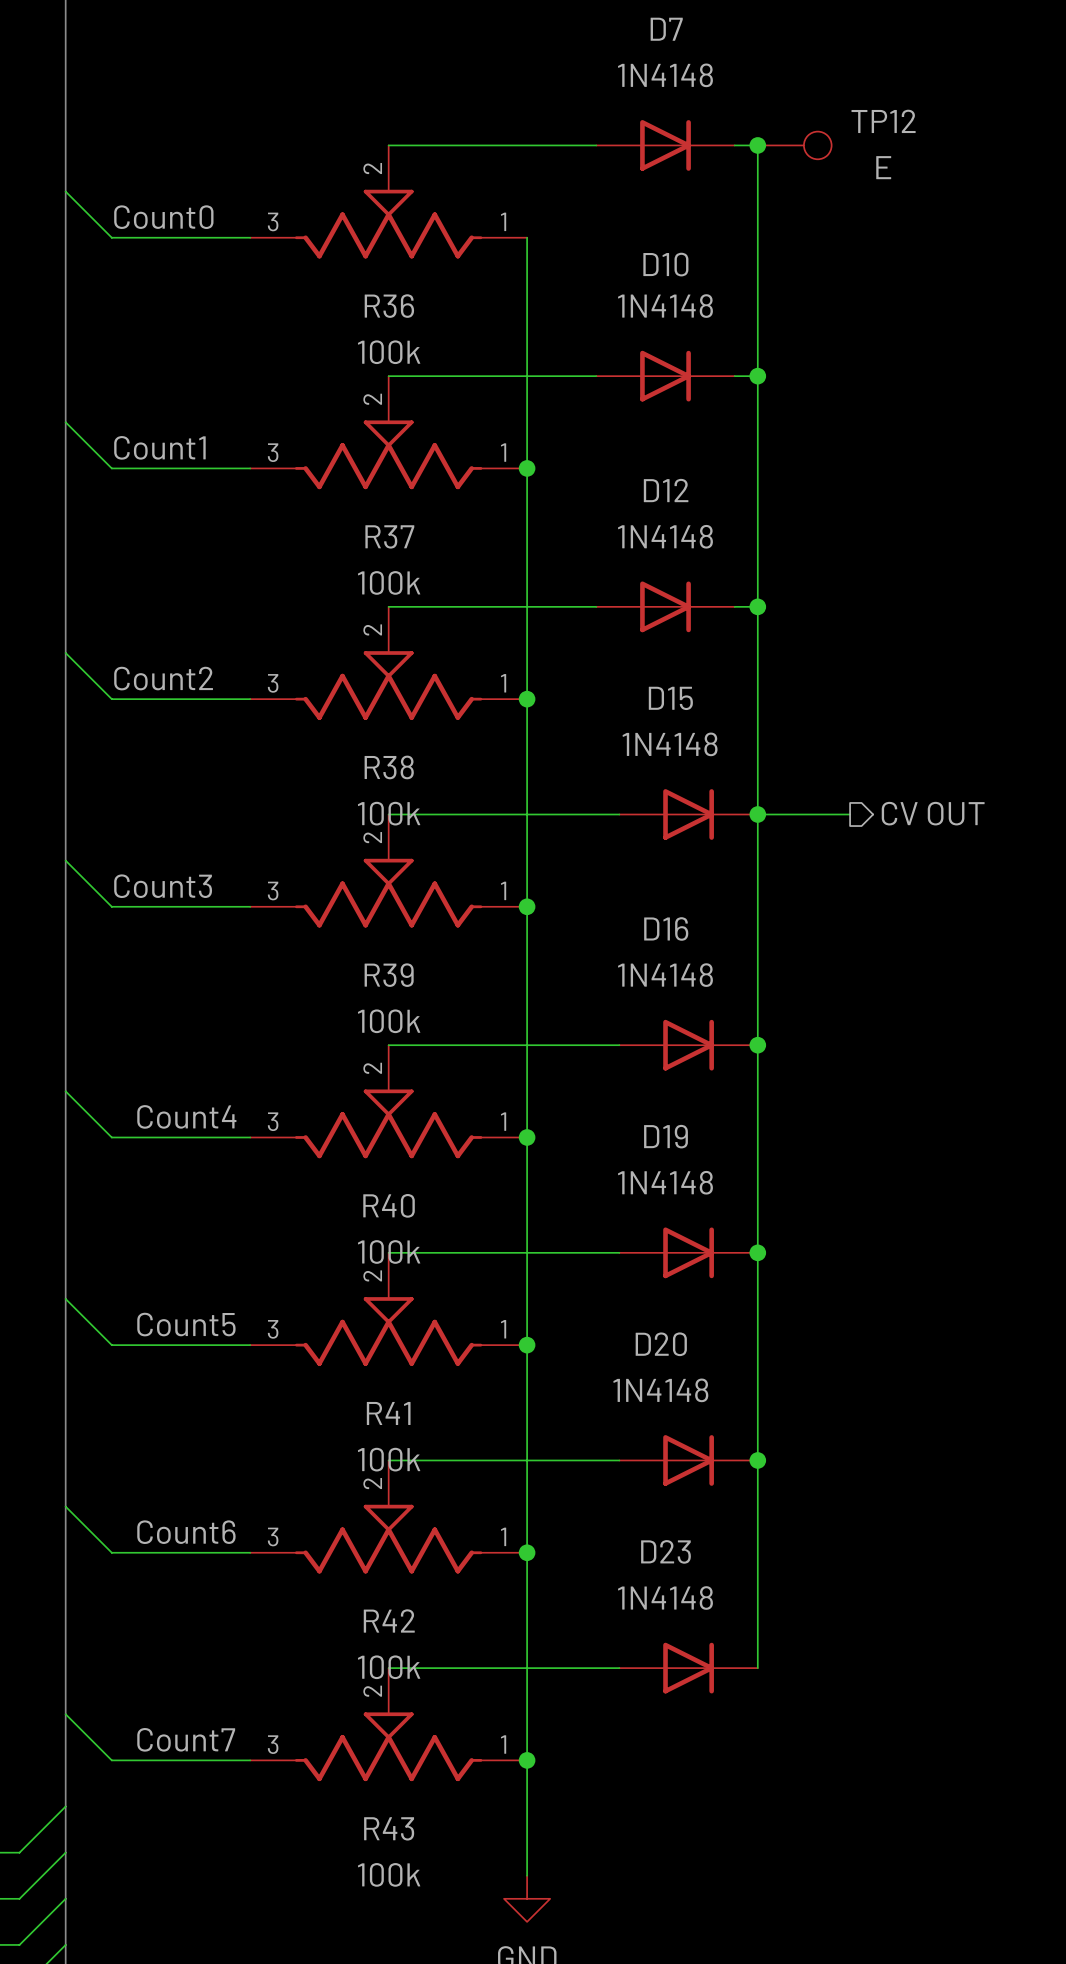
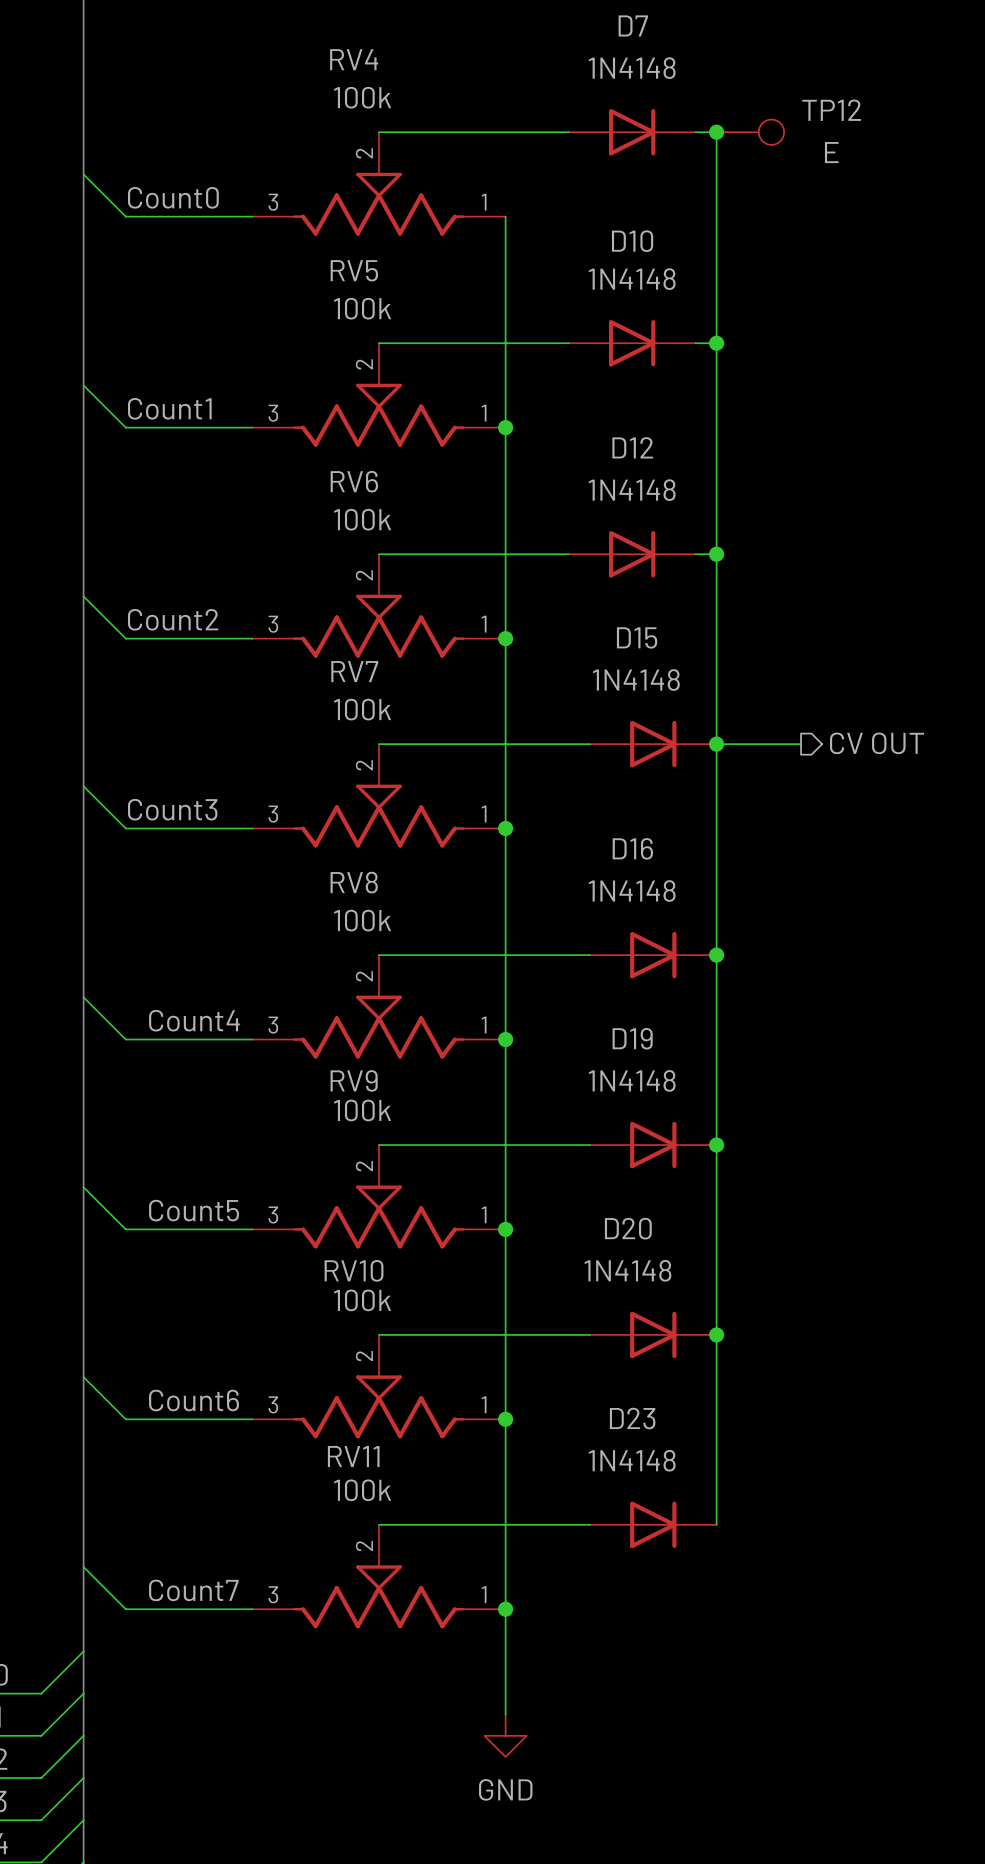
R36 name: R36 (389, 306) -> RV4 (354, 59)
R36 value position: 100k (389, 352) -> 100k (362, 97)
R37 name: R37 (389, 536) -> RV5 (354, 270)
R37 value position: 100k (389, 582) -> 100k (362, 308)
R38 name: R38 (389, 767) -> RV6 (354, 481)
R38 value position: 100k (389, 813) -> 100k (362, 519)
R39 name: R39 (389, 975) -> RV7 (354, 671)
R39 value position: 100k (389, 1021) -> 100k (362, 709)
R40 name: R40 (389, 1205) -> RV8 (354, 882)
R40 value position: 100k (389, 1251) -> 100k (362, 920)
R41 name: R41 (388, 1413) -> RV9 (354, 1080)
R41 value position: 100k (389, 1459) -> 100k (362, 1110)
R42 name: R42 (389, 1620) -> RV10 (354, 1270)
R42 value position: 100k (389, 1667) -> 100k (362, 1300)
R43 name: R43 (389, 1828) -> RV11 (353, 1456)
R43 value position: 100k (389, 1874) -> 100k (362, 1490)

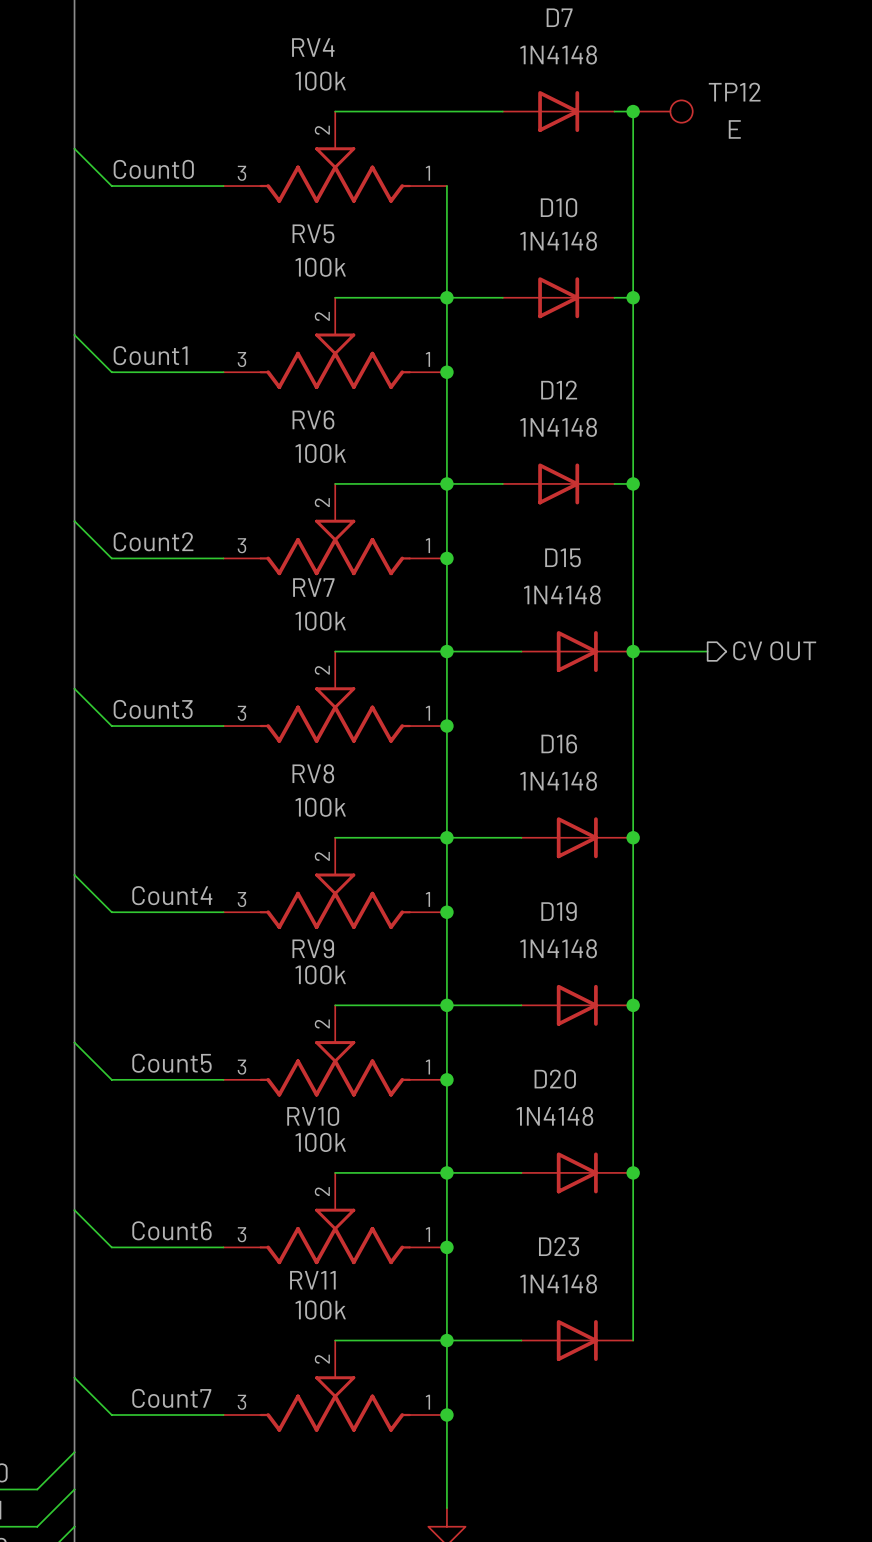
junction: none -> (446, 297)
junction: none -> (446, 483)
junction: none -> (446, 651)
junction: none -> (446, 837)
junction: none -> (446, 1005)
junction: none -> (446, 1172)
junction: none -> (446, 1340)

